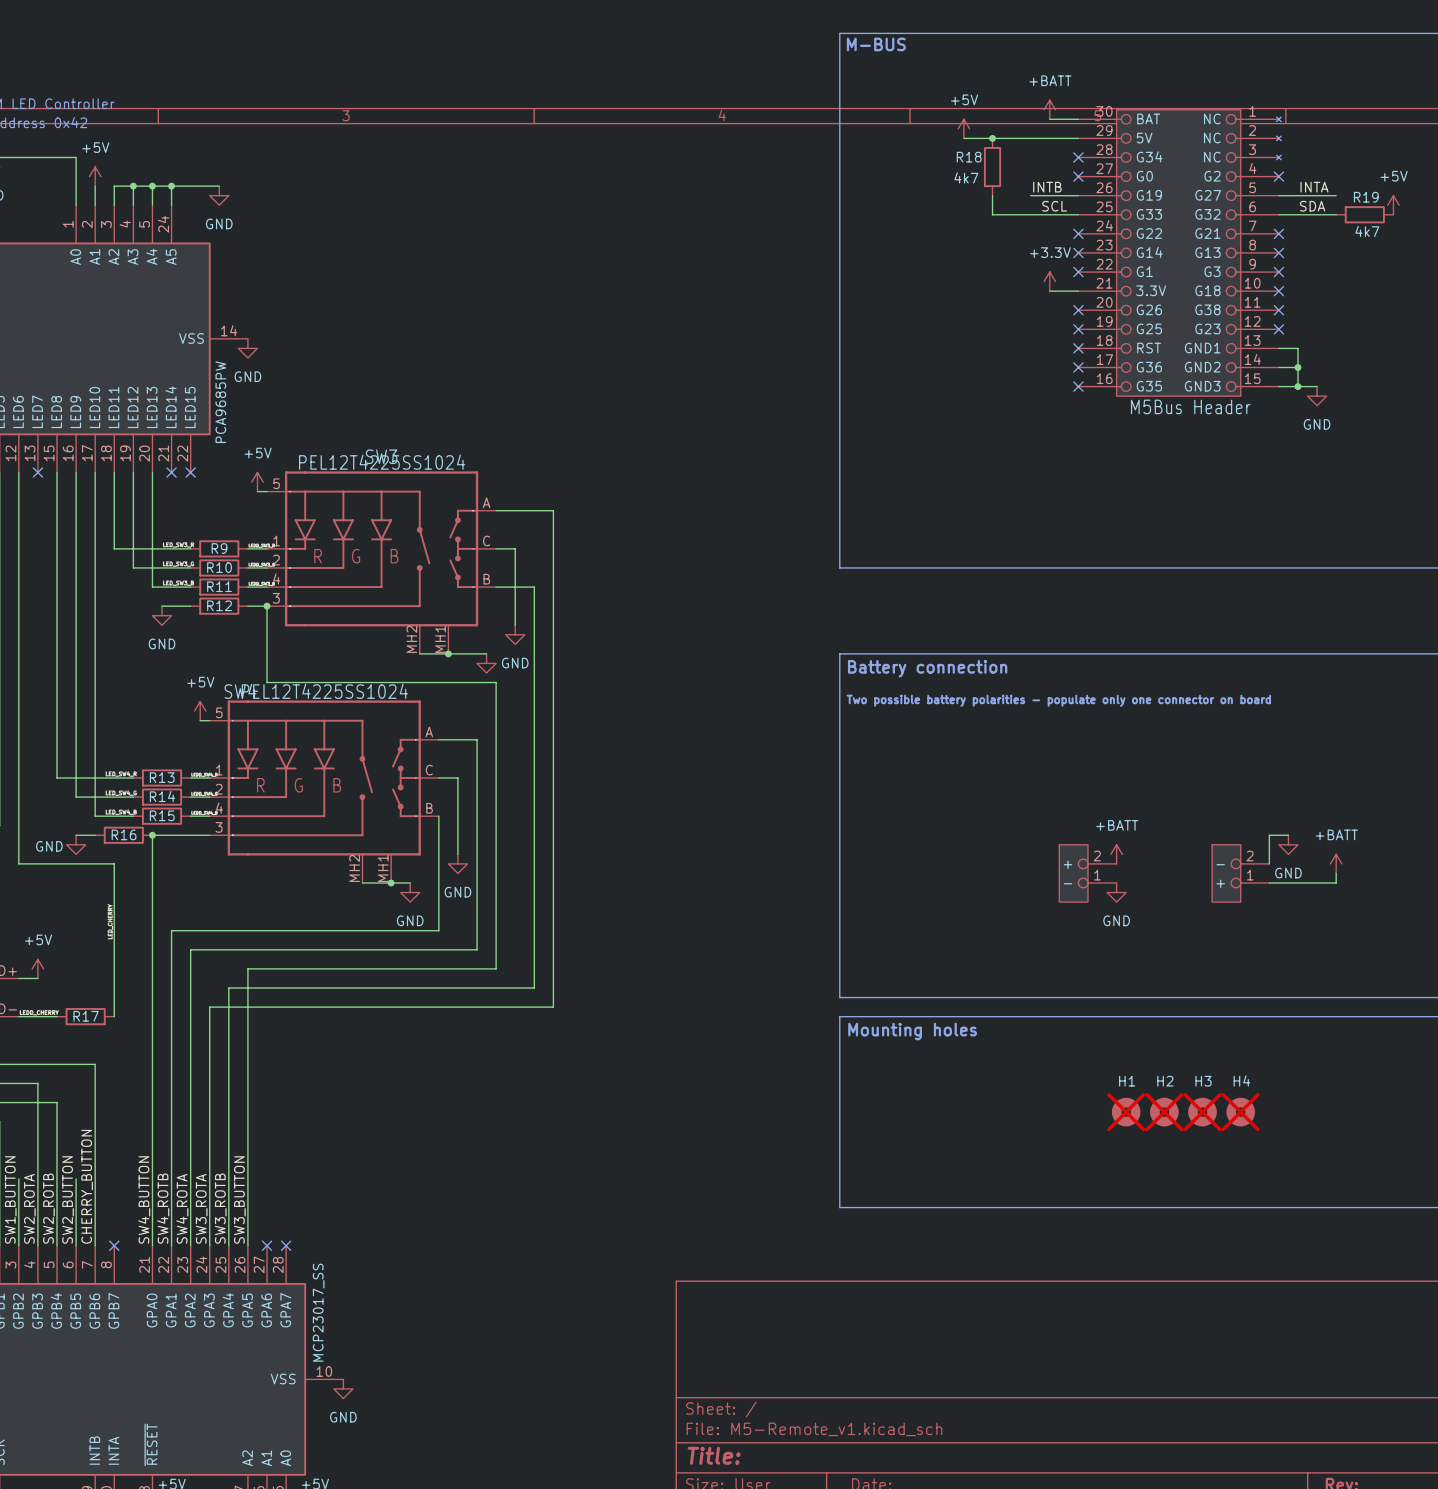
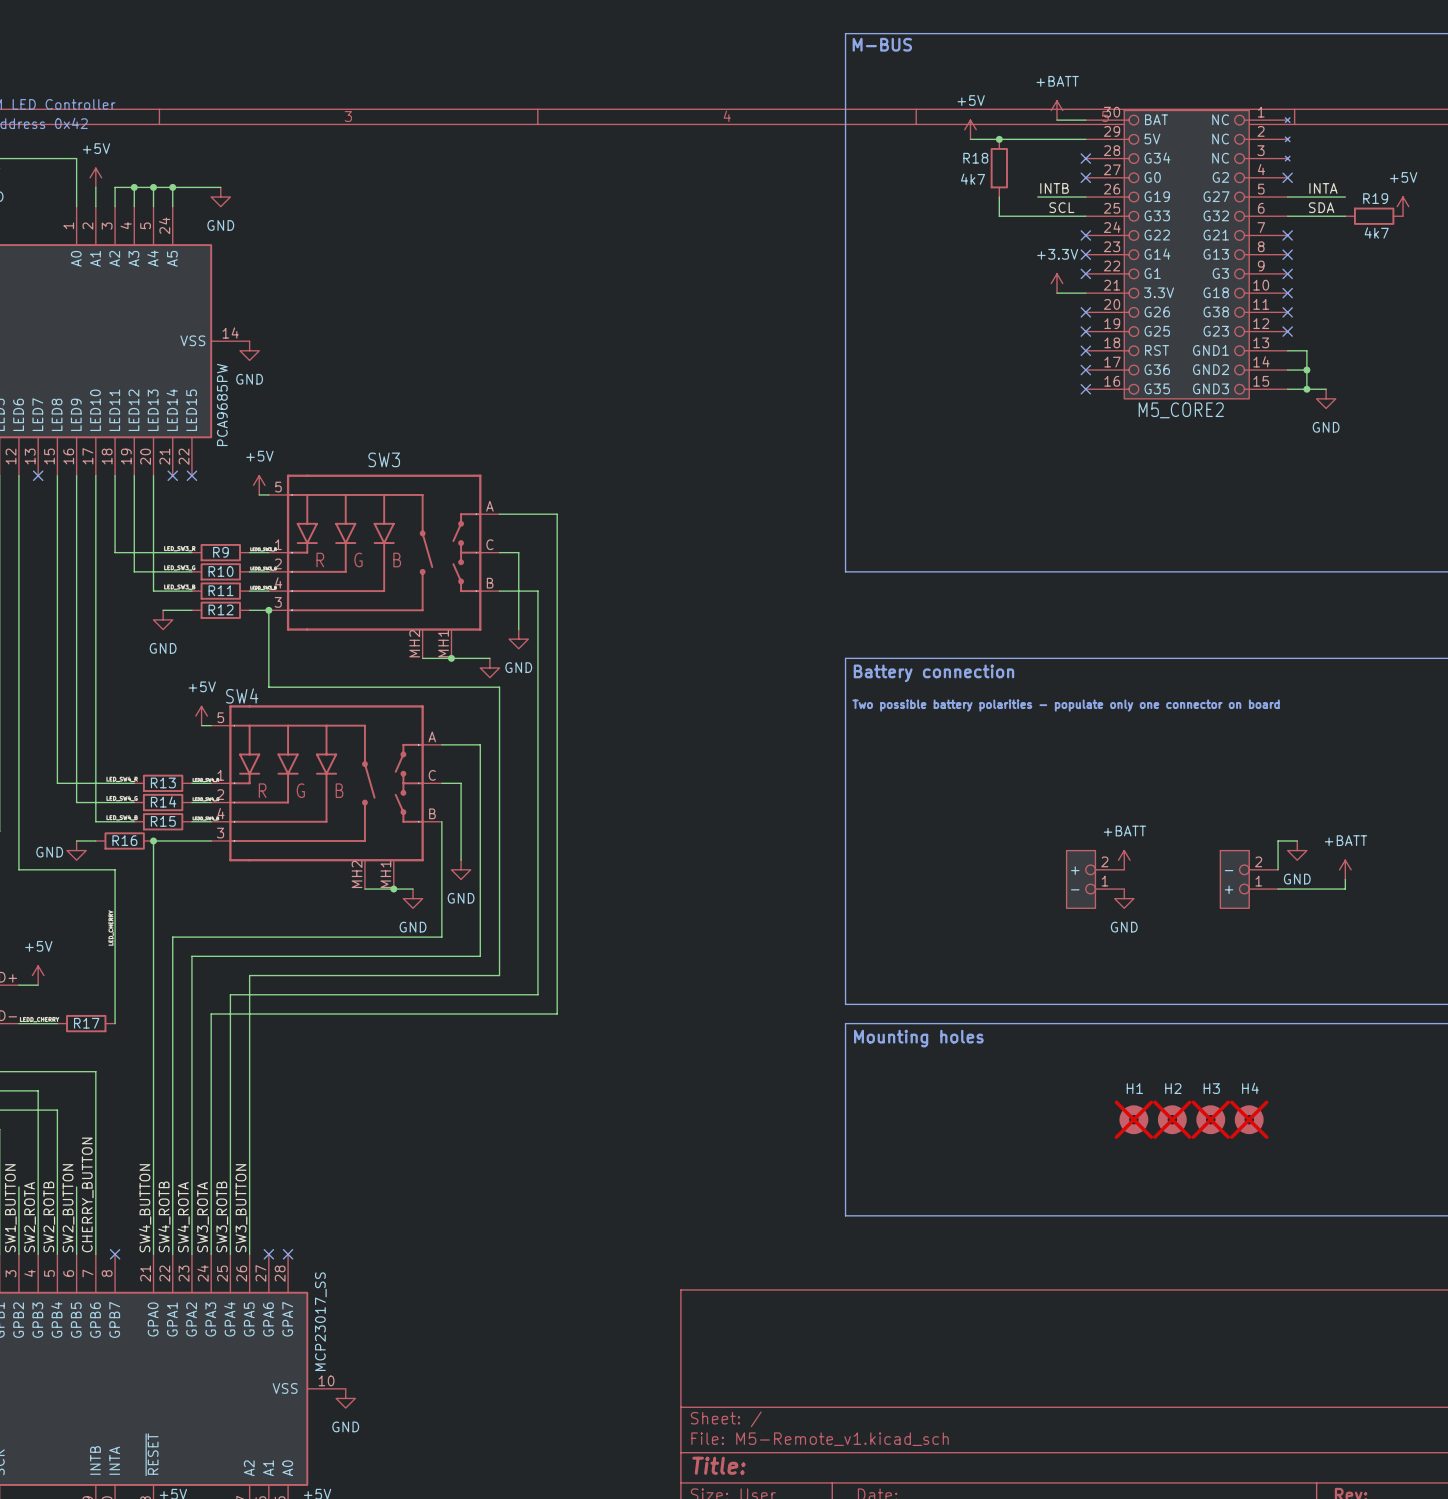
part value: M5Bus Header (1190, 406) -> M5_CORE2 (1181, 410)
SW3 value: PEL12T4225SS1024 (382, 462) -> none
SW4 value: PEL12T4225SS1024 (324, 691) -> none

